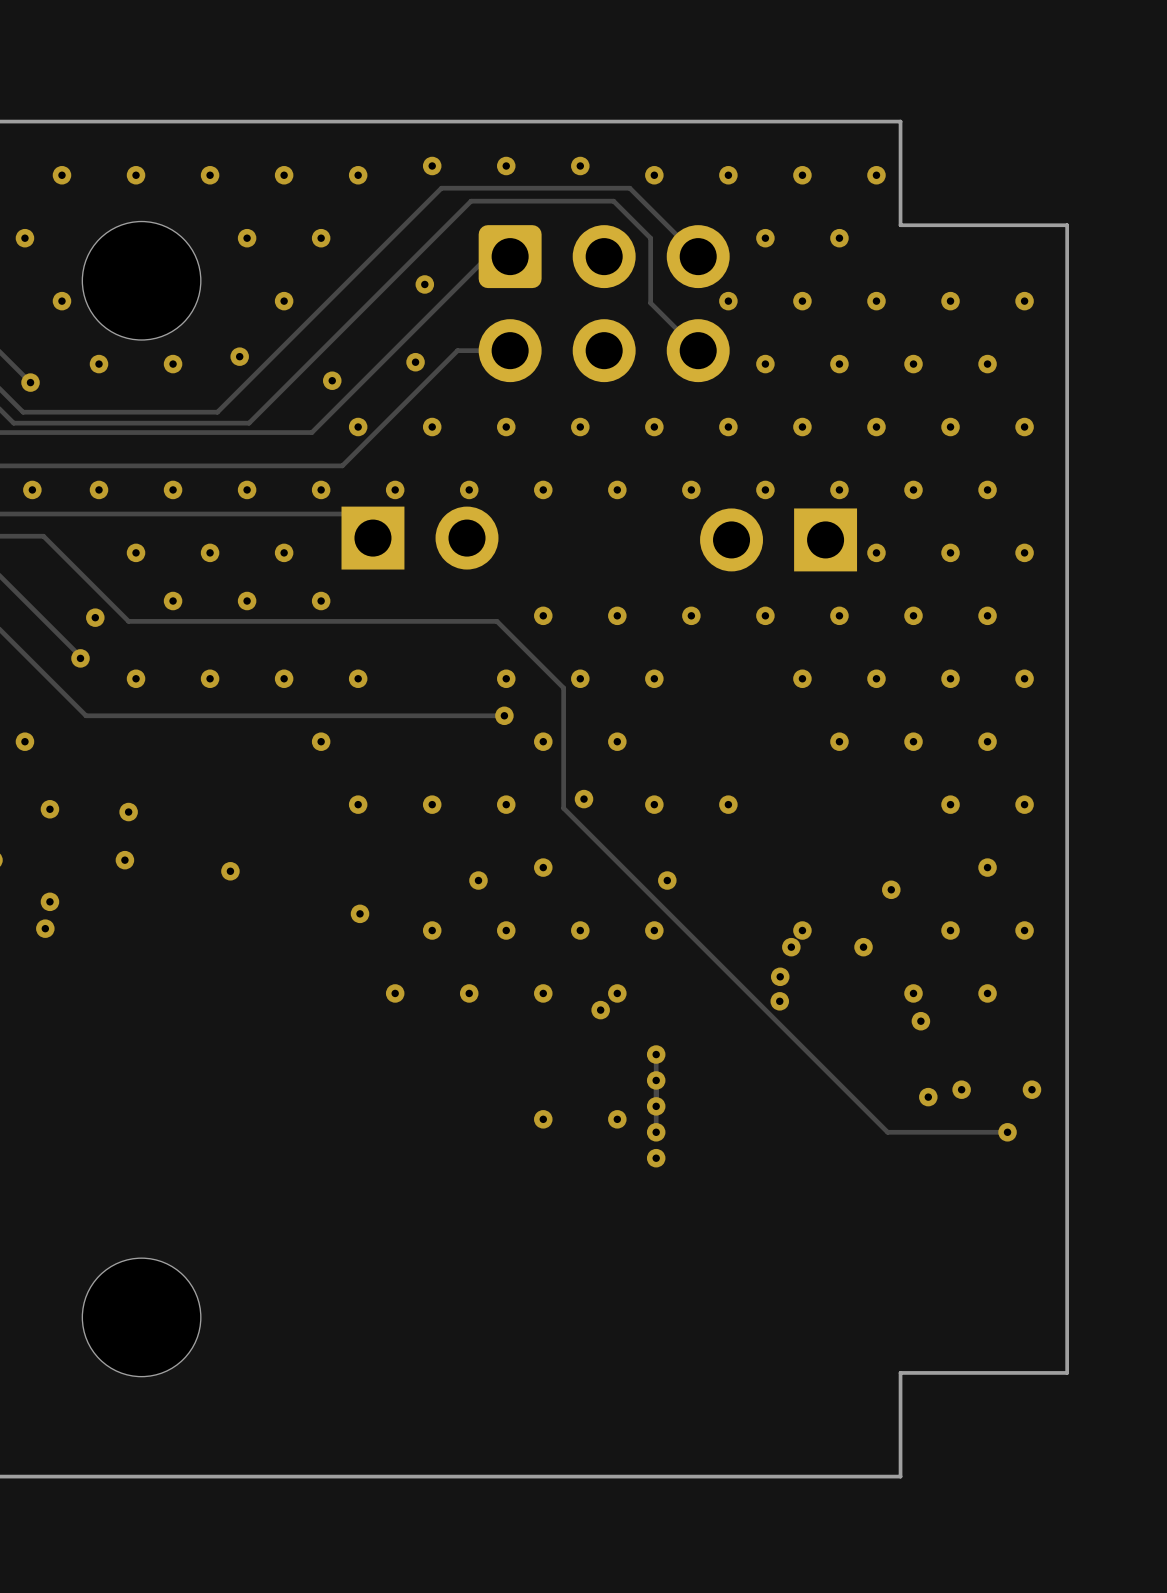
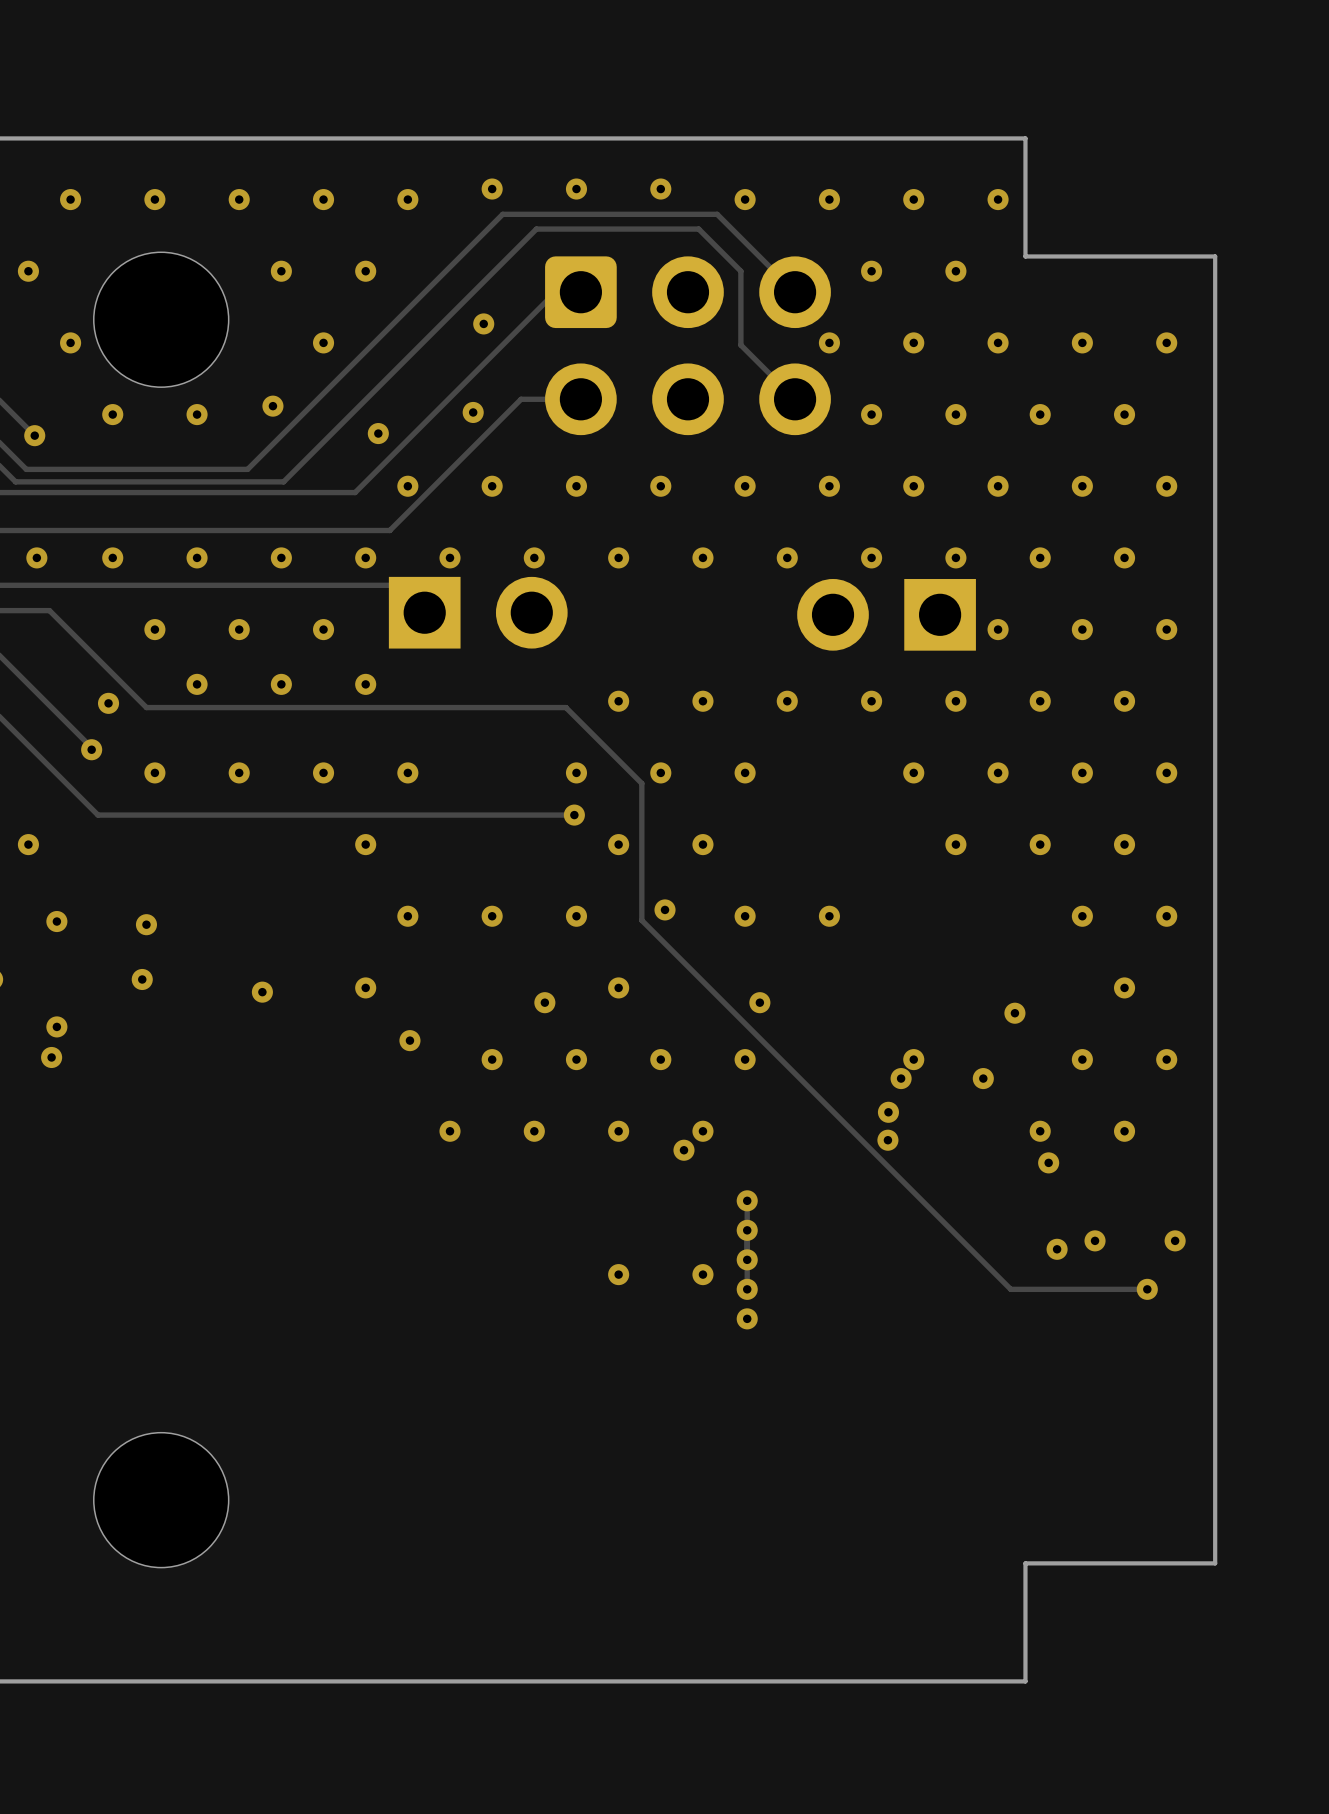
via: none -> (365, 987)

